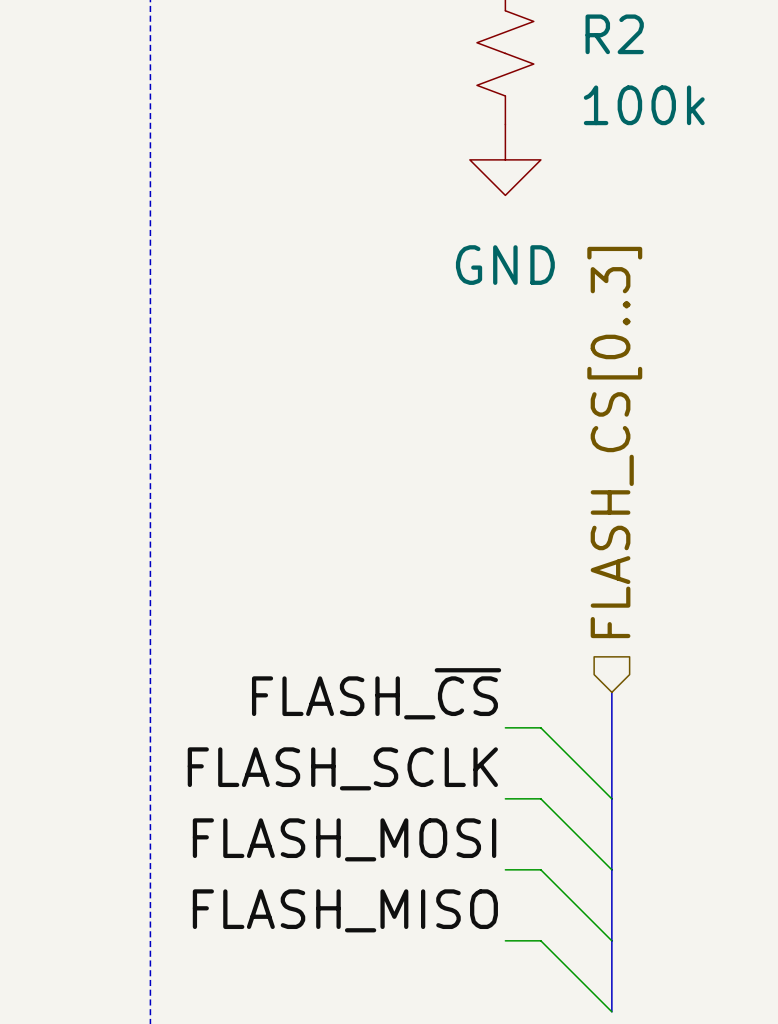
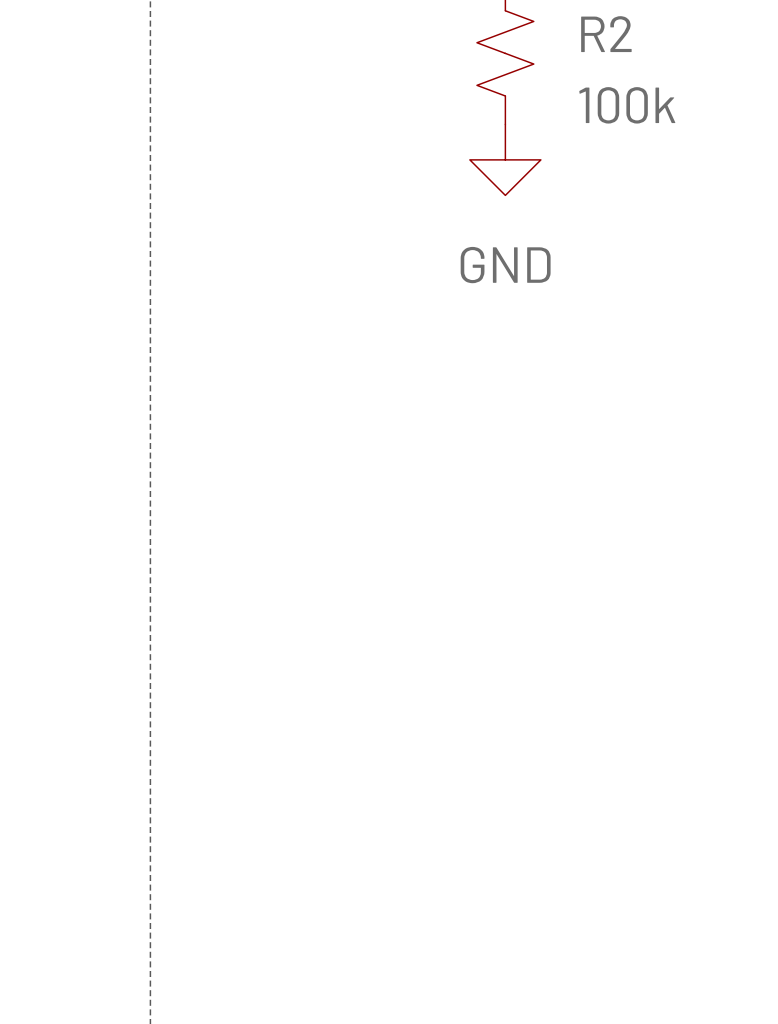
hierarchical label: FLASH_CS[0..3] (614, 442) -> none
bus: (611, 692) (611, 1011) -> none
label: FLASH_~{CS} (376, 693) -> none
wire: (505, 727) (540, 727) (611, 798) -> none
label: FLASH_SCLK (342, 768) -> none
wire: (505, 798) (540, 798) (611, 869) -> none
label: FLASH_MOSI (344, 839) -> none
wire: (505, 869) (540, 869) (611, 940) -> none
label: FLASH_MISO (345, 910) -> none
wire: (505, 940) (540, 940) (611, 1011) -> none

